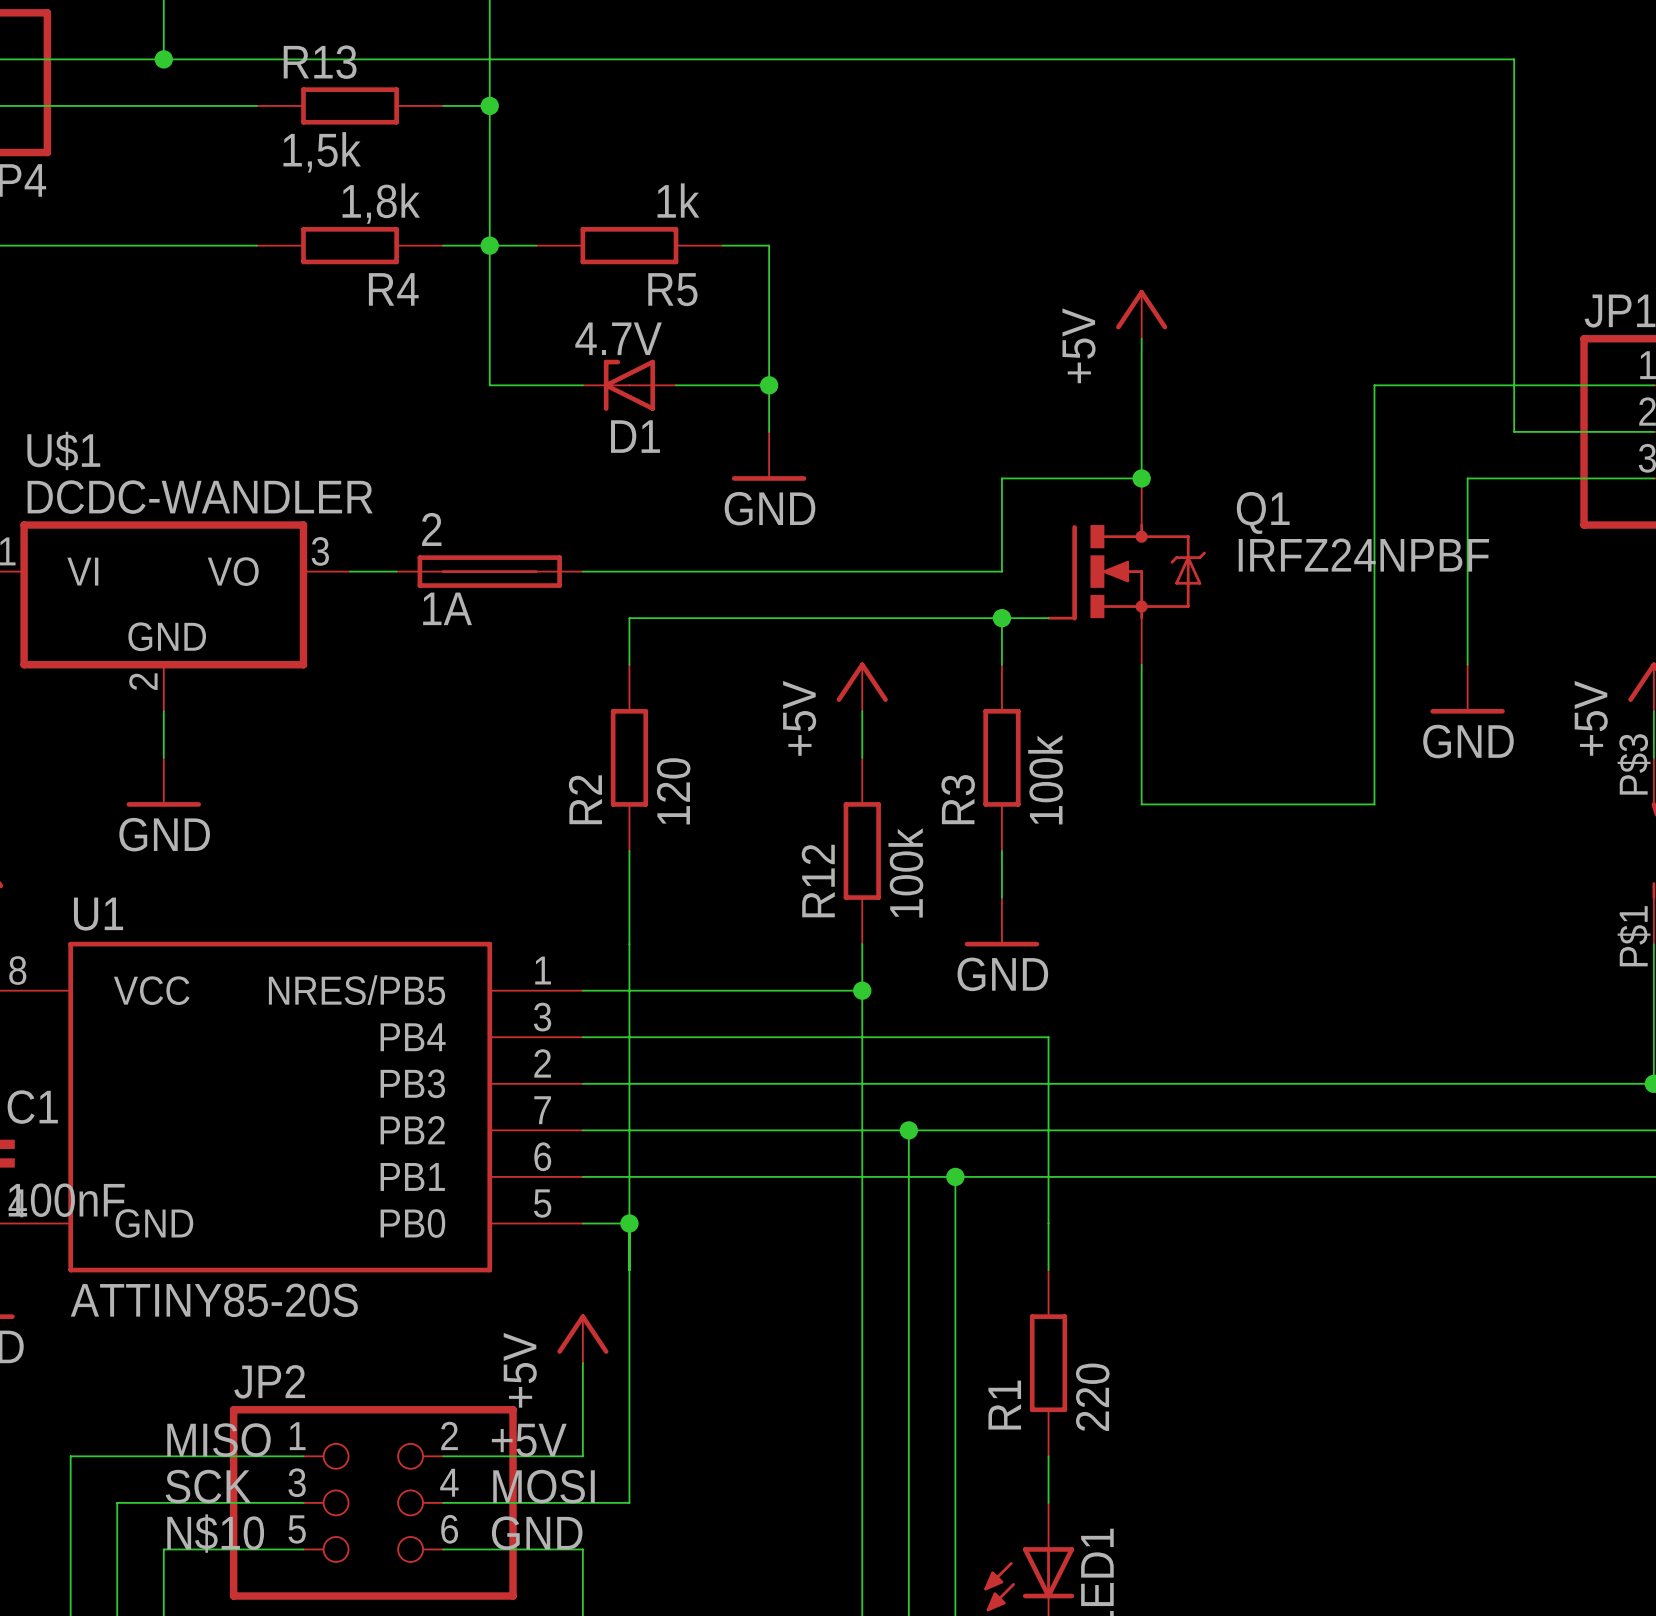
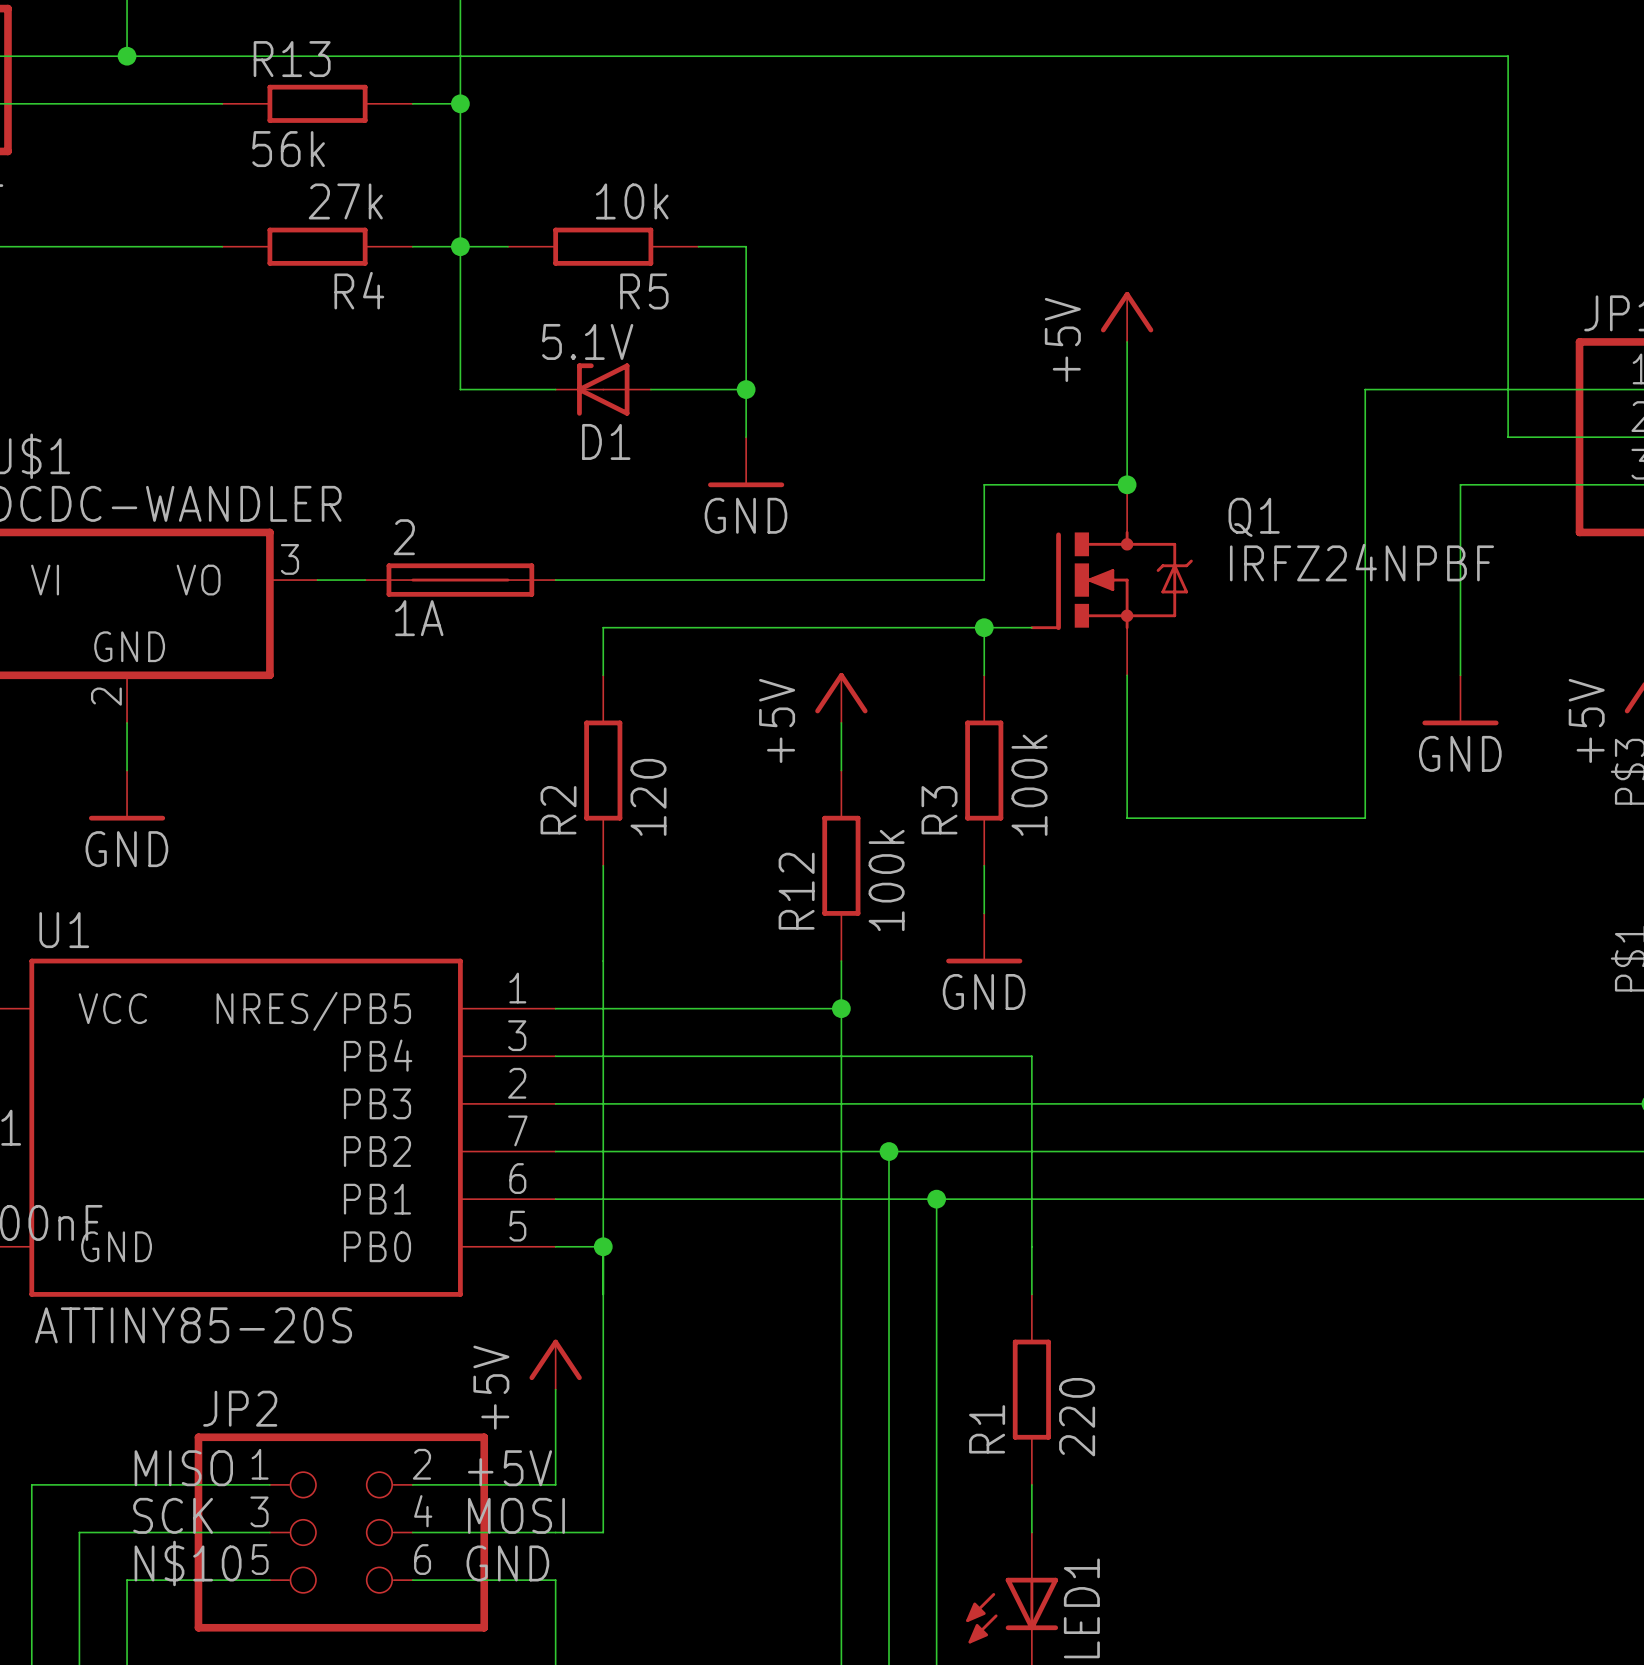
R13 value: 1,5k (322, 152) -> 56k (288, 149)
R5 value: 1k (678, 200) -> 10k (632, 201)
R4 value: 1,8k (381, 203) -> 27k (345, 201)
D1 value: 4.7V (618, 338) -> 5.1V (587, 341)

